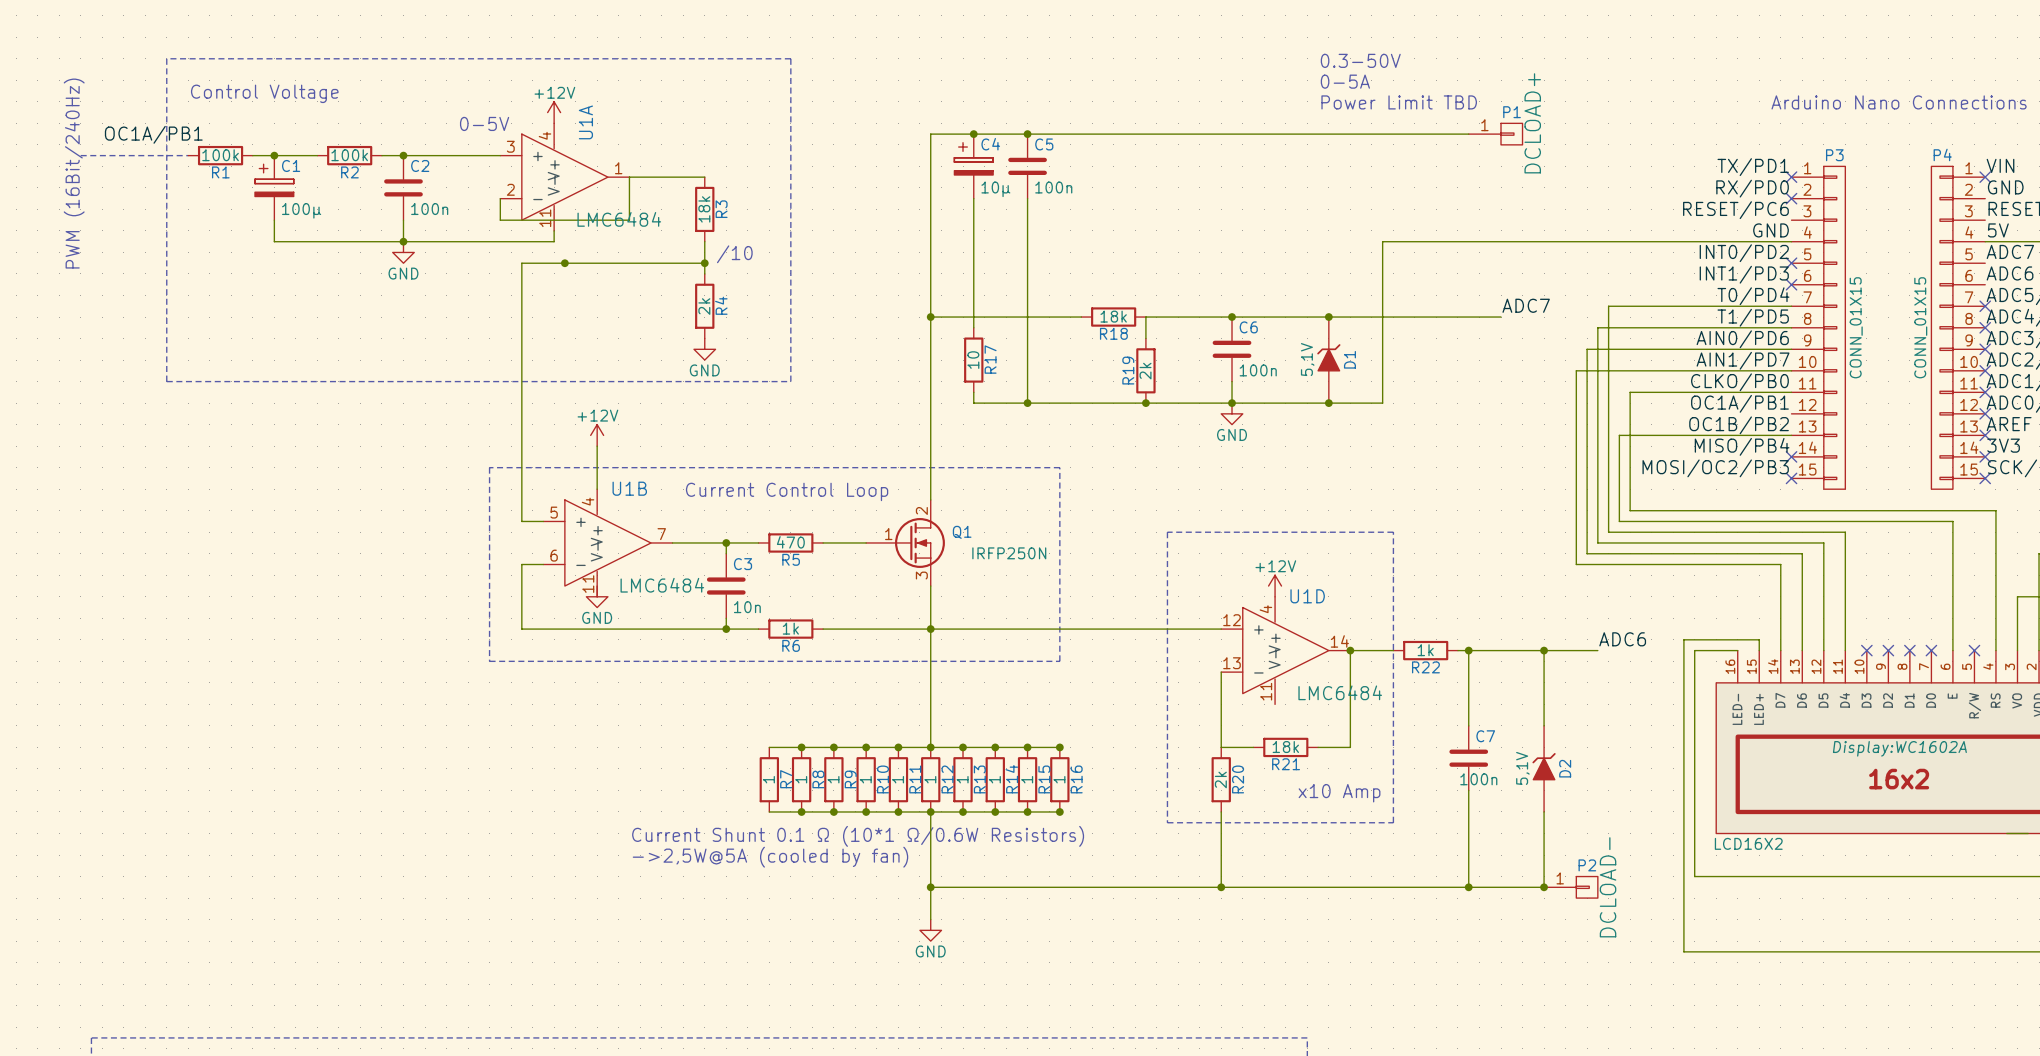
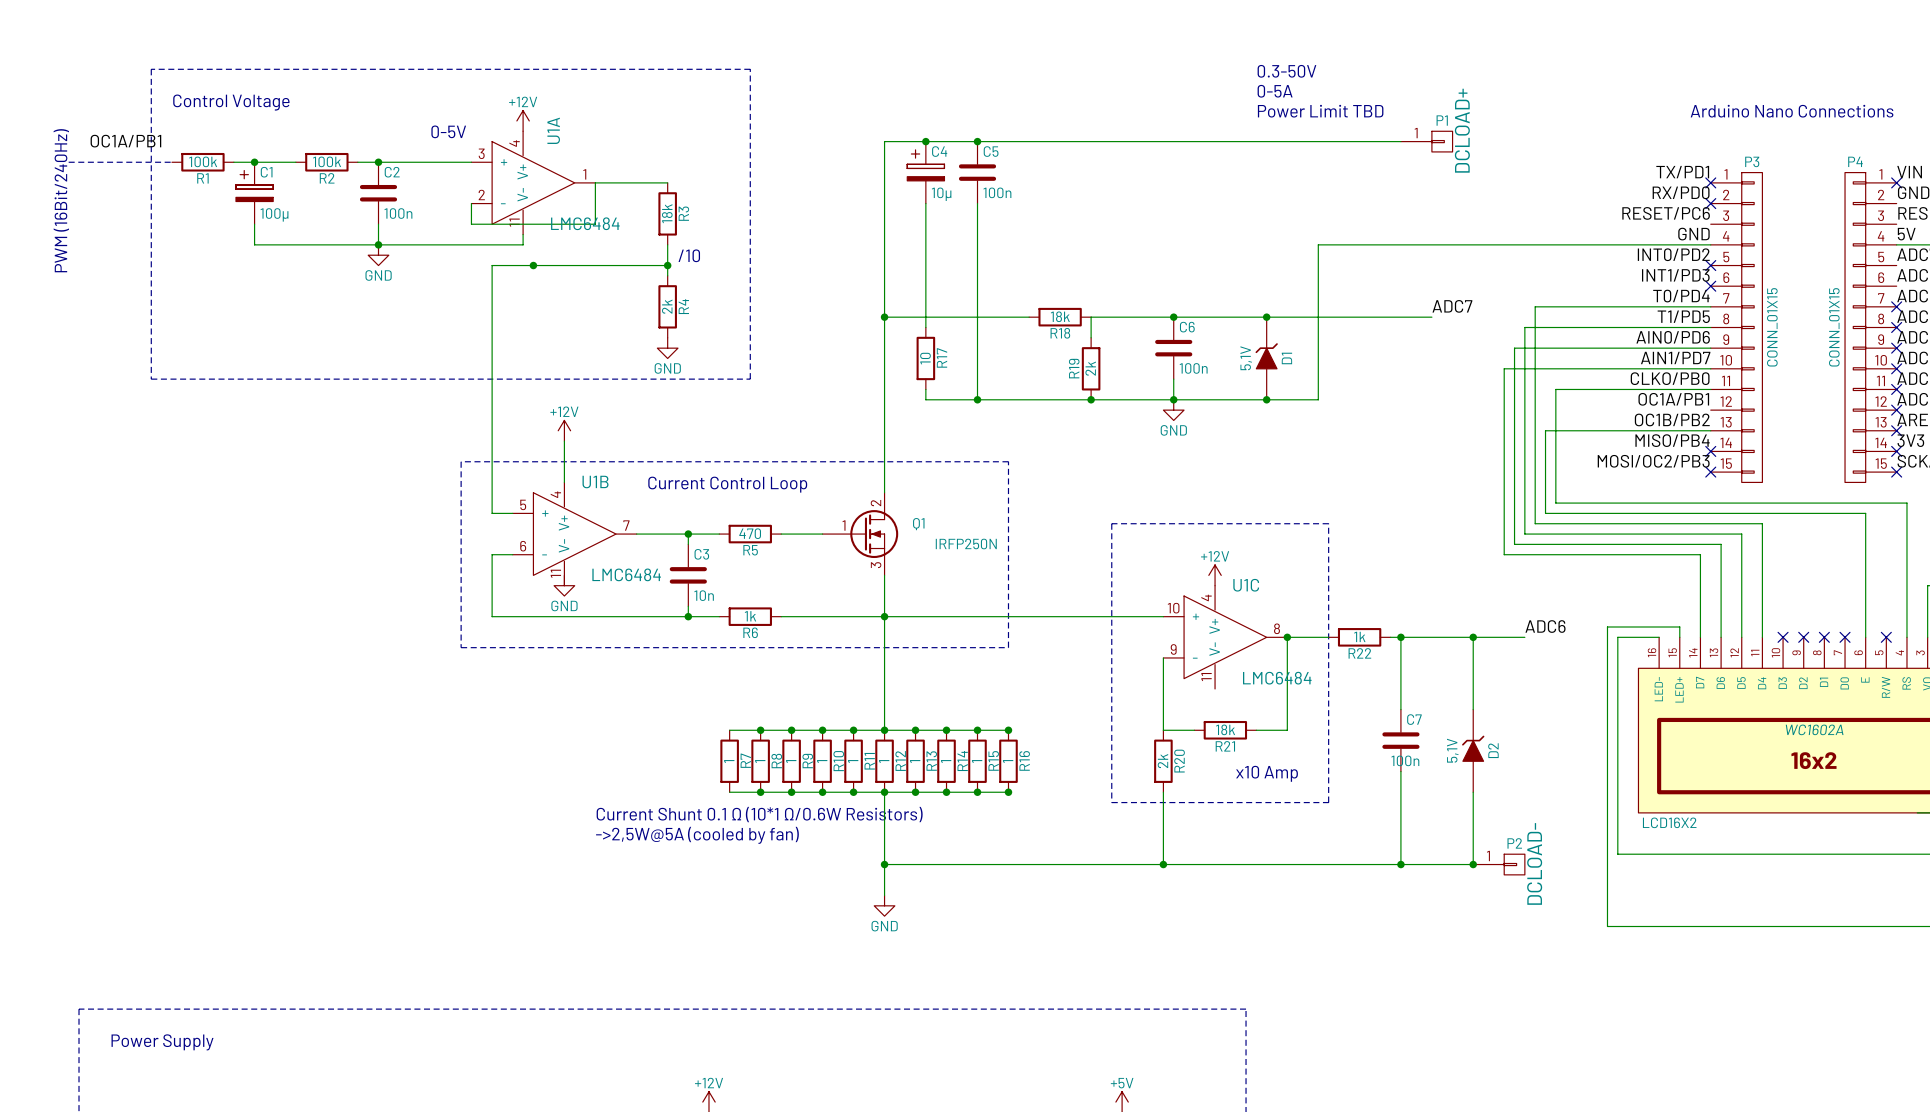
U1D name: U1D (1307, 596) -> U1C (1246, 585)
U1D pin number: 12 (1232, 620) -> 10 (1173, 608)
U1D pin number: 14 (1339, 641) -> 8 (1276, 628)
U1D pin number: 13 (1232, 663) -> 9 (1173, 649)
part text: Display:WC1602A (1899, 748) -> WC1602A (1814, 729)

